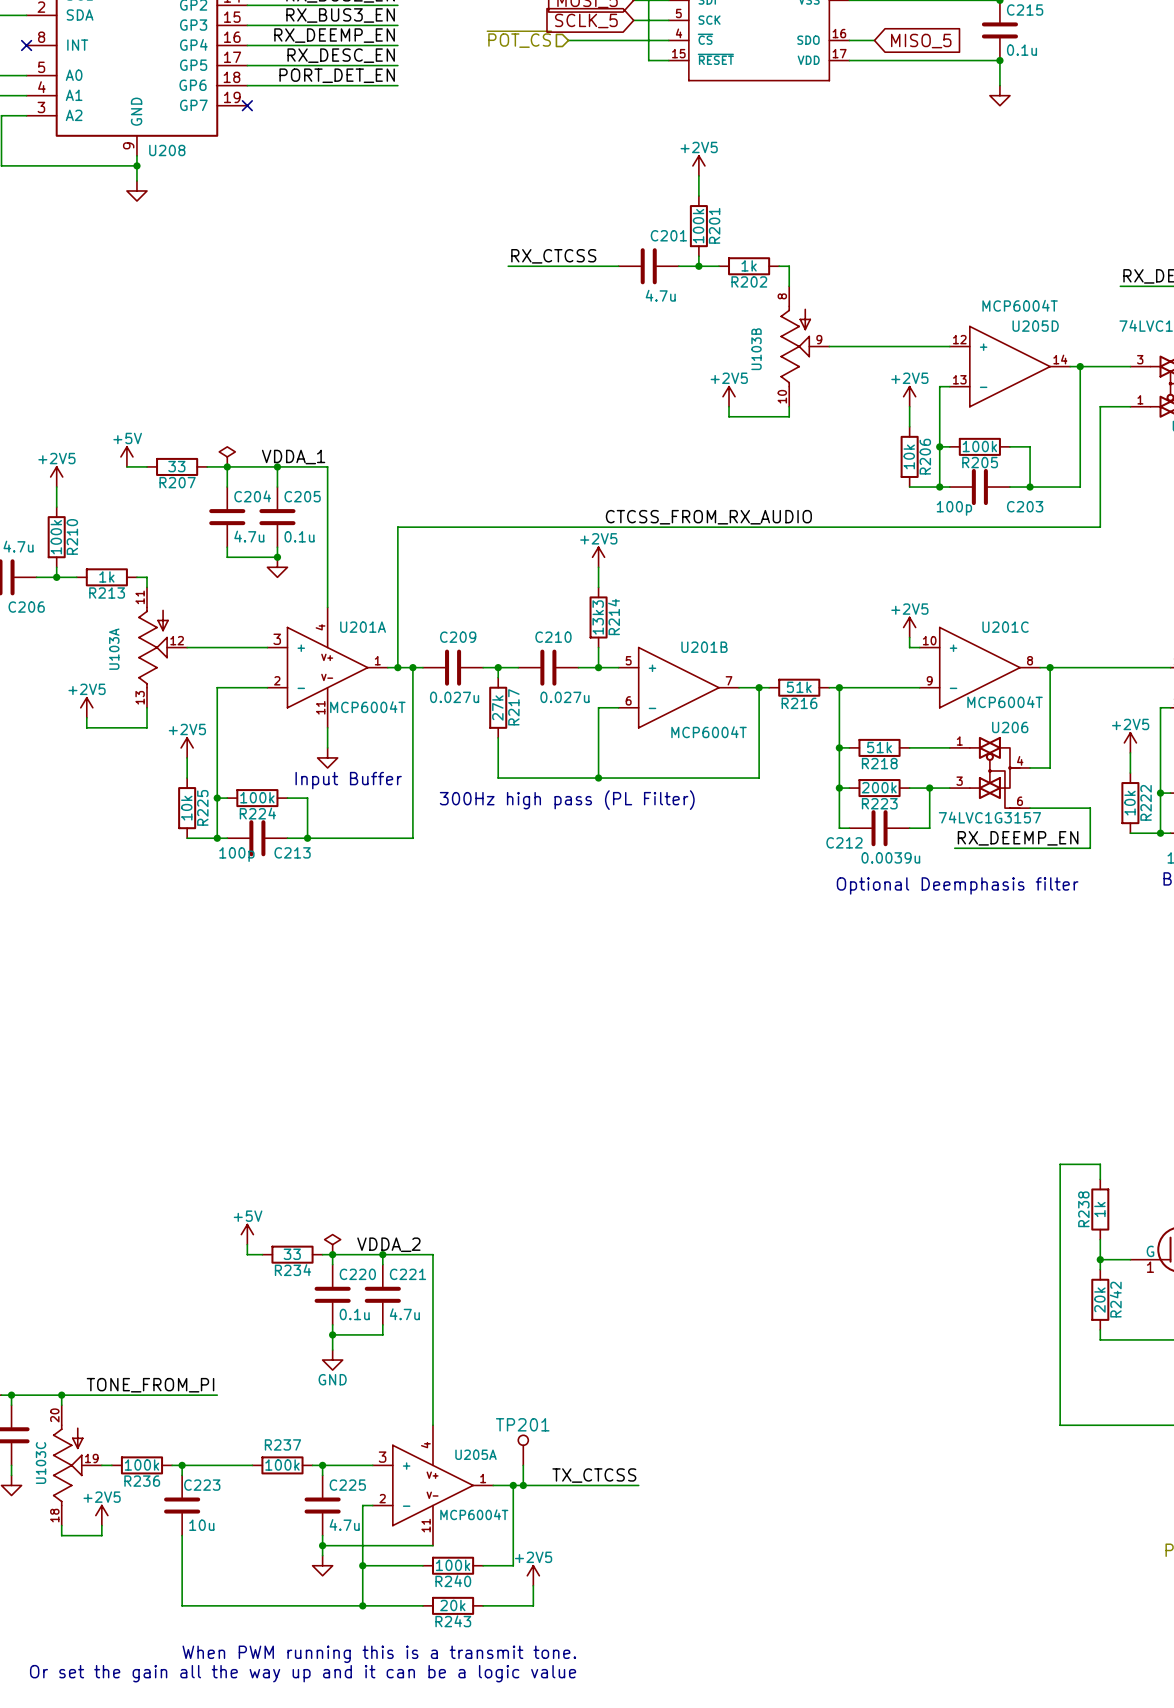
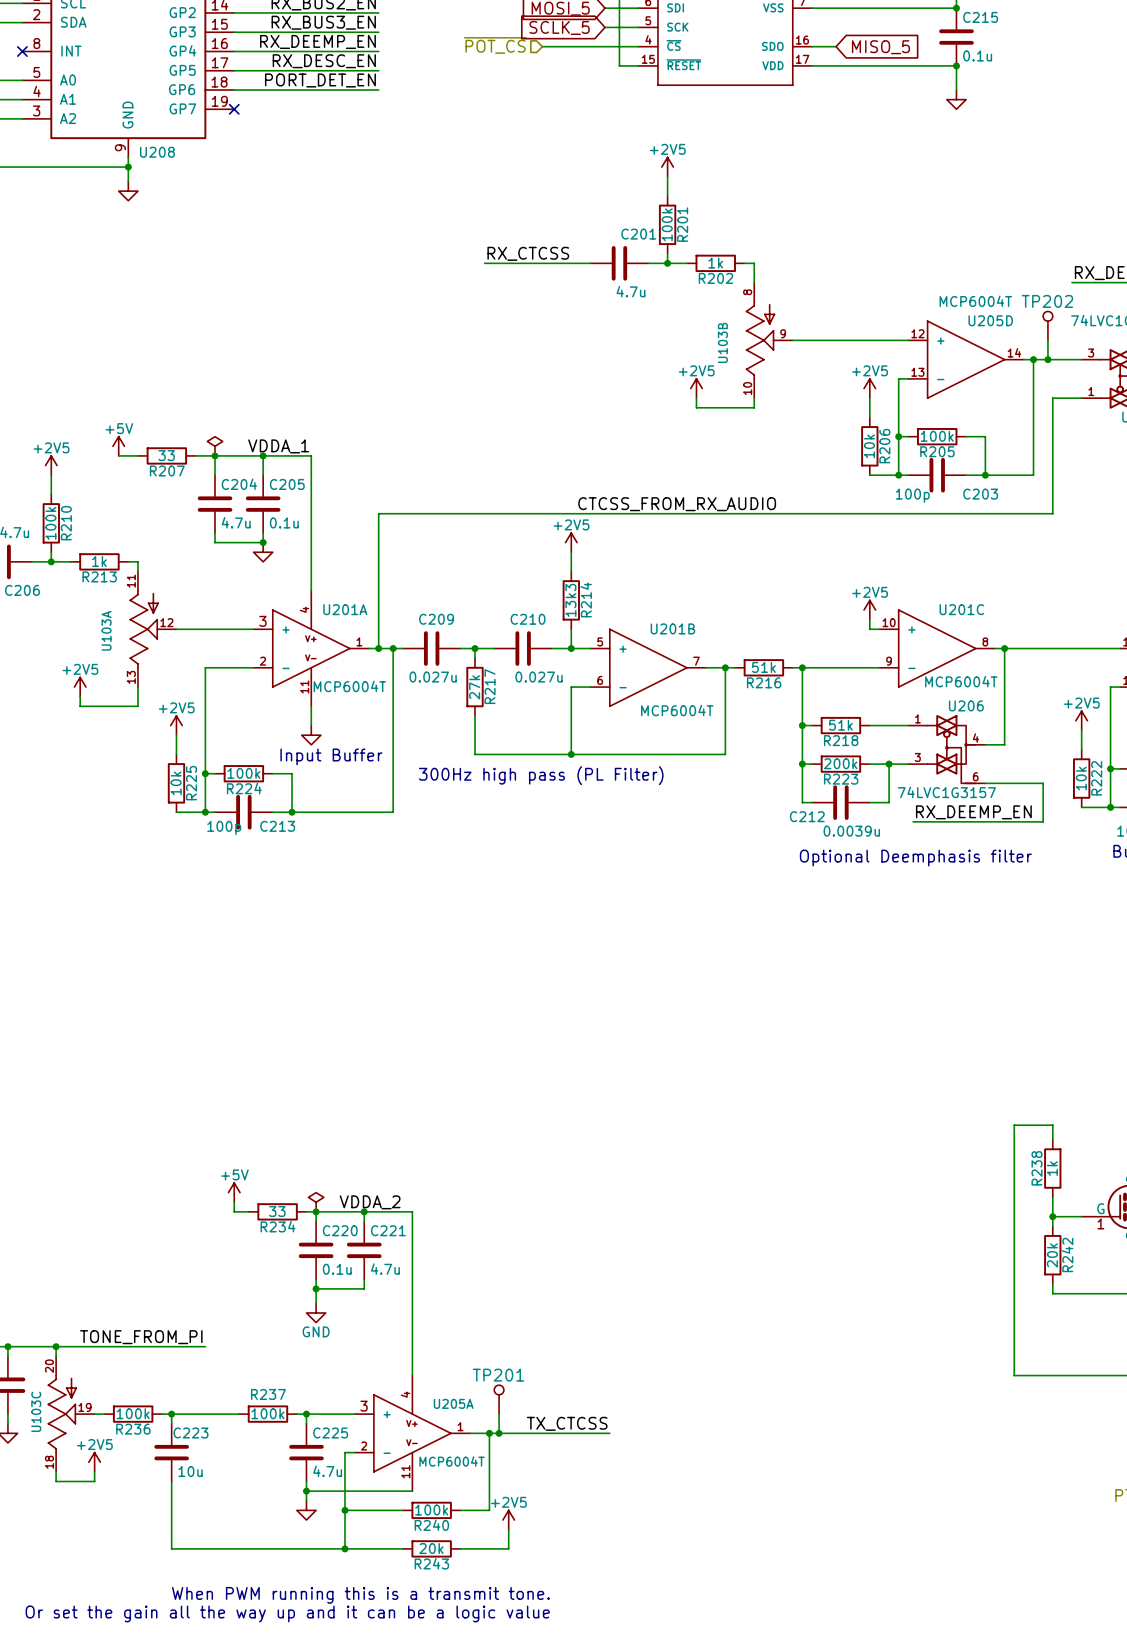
TP202: none -> (1047, 325)
wire: none -> (1047, 340) (1047, 359)
junction: none -> (1047, 359)

